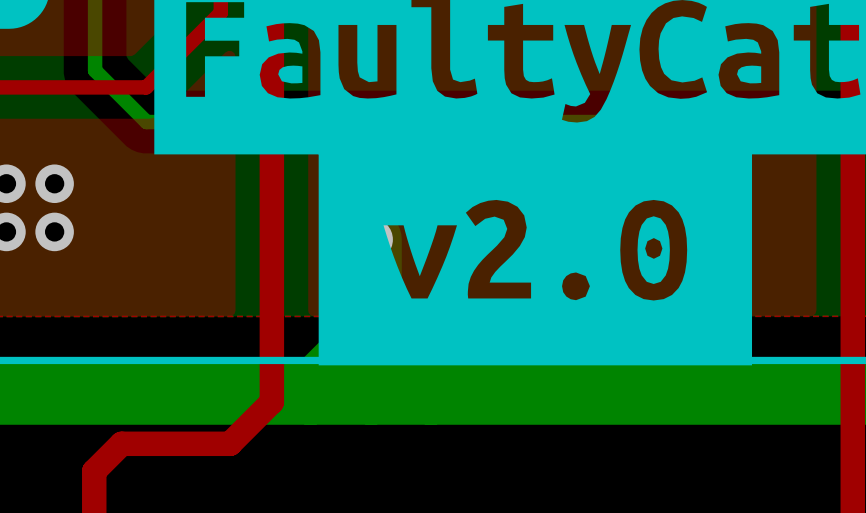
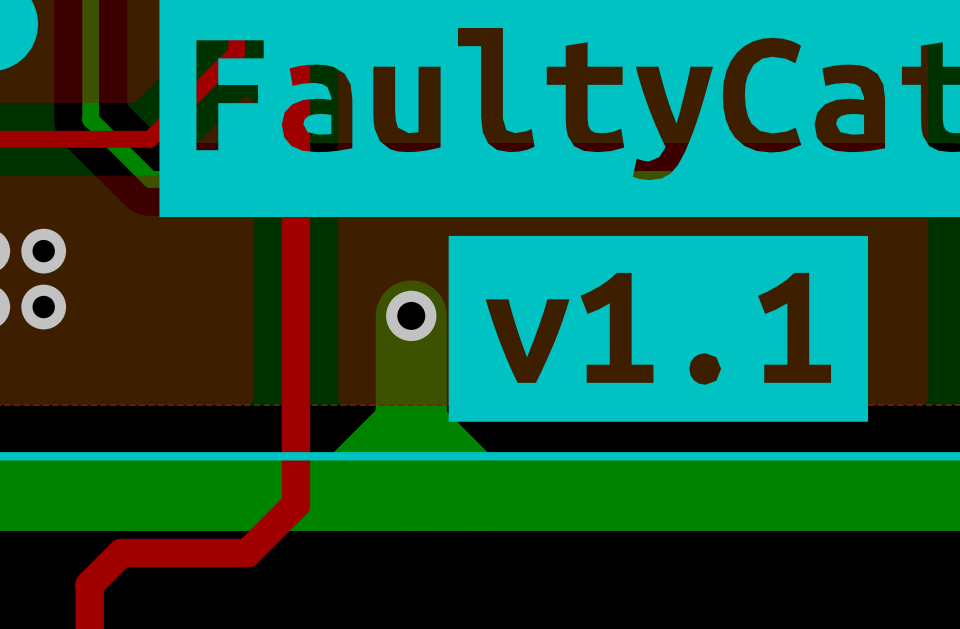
drawing: [318, 135, 753, 366] -> none
drawing: none -> [448, 235, 869, 422]

